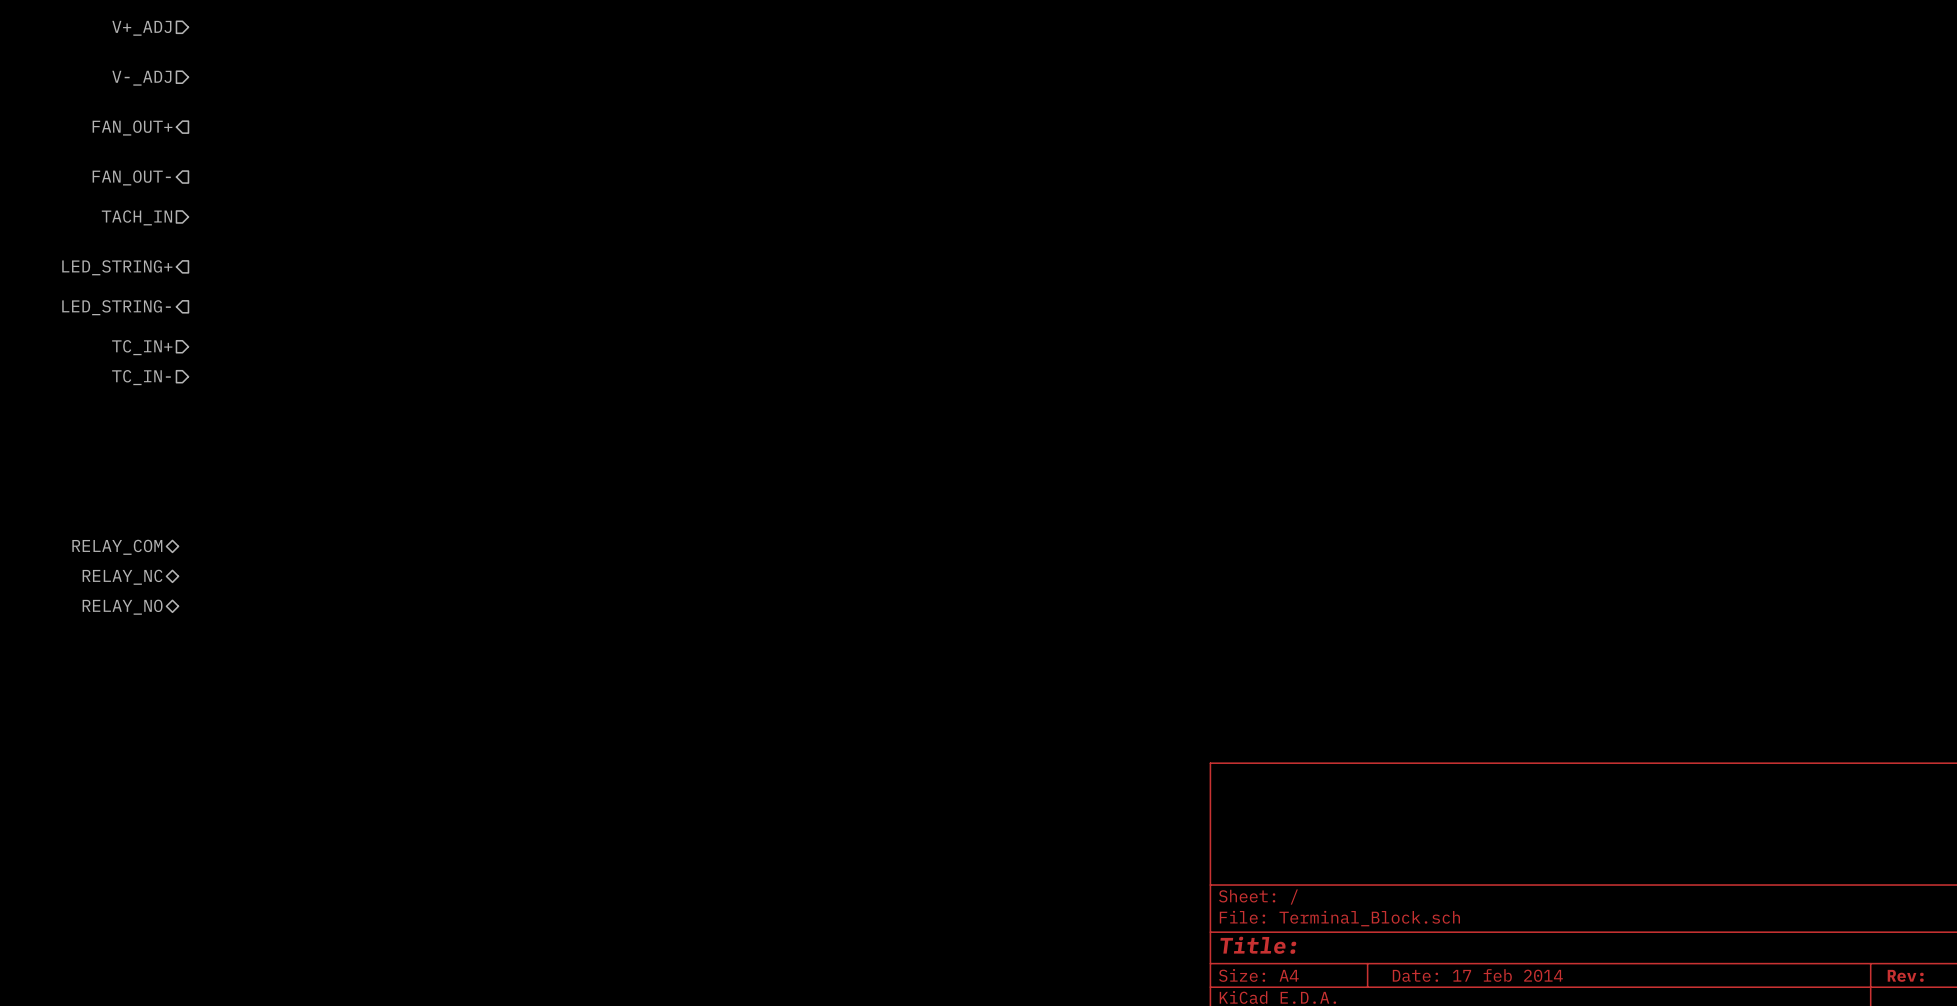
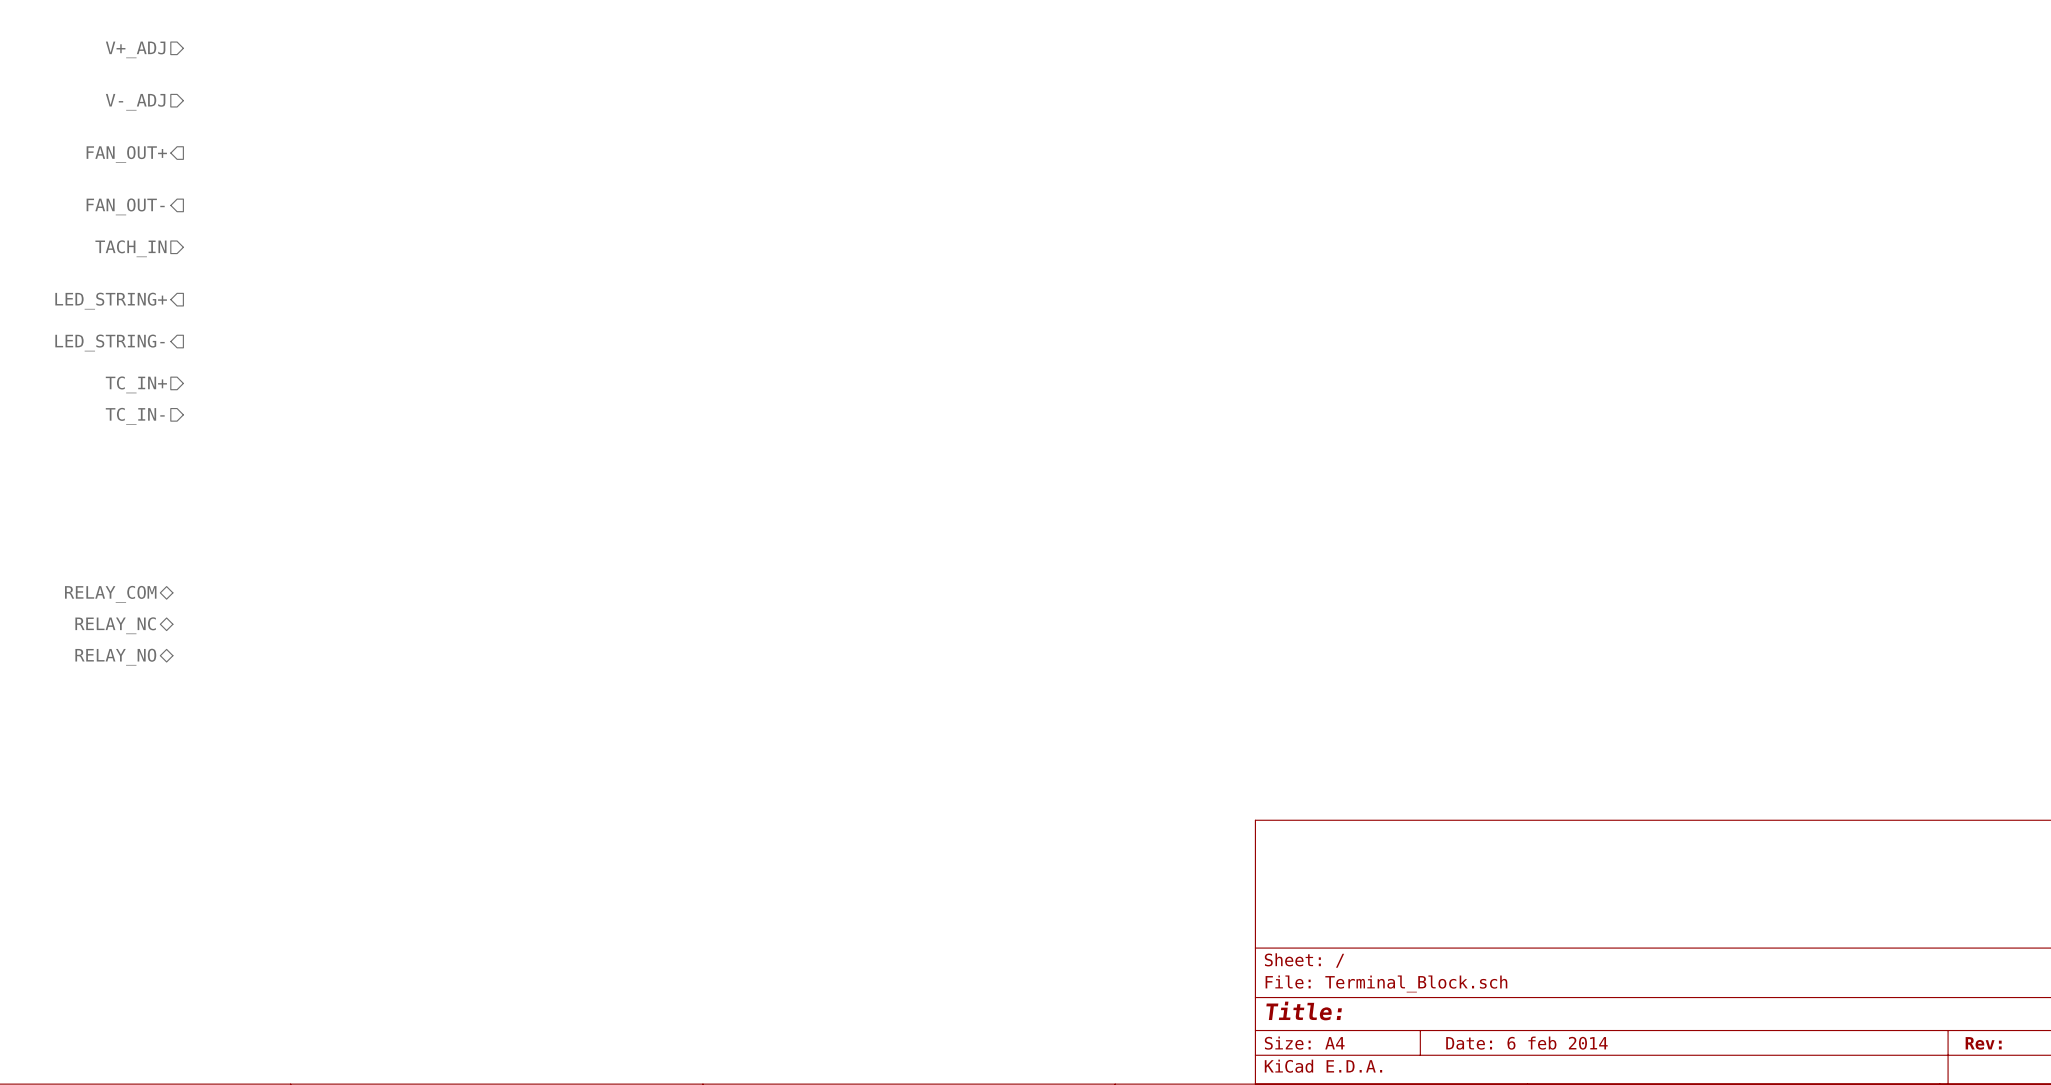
title block: Date: 17 feb 2014 (1477, 975) -> Date: 6 feb 2014 (1526, 1043)

